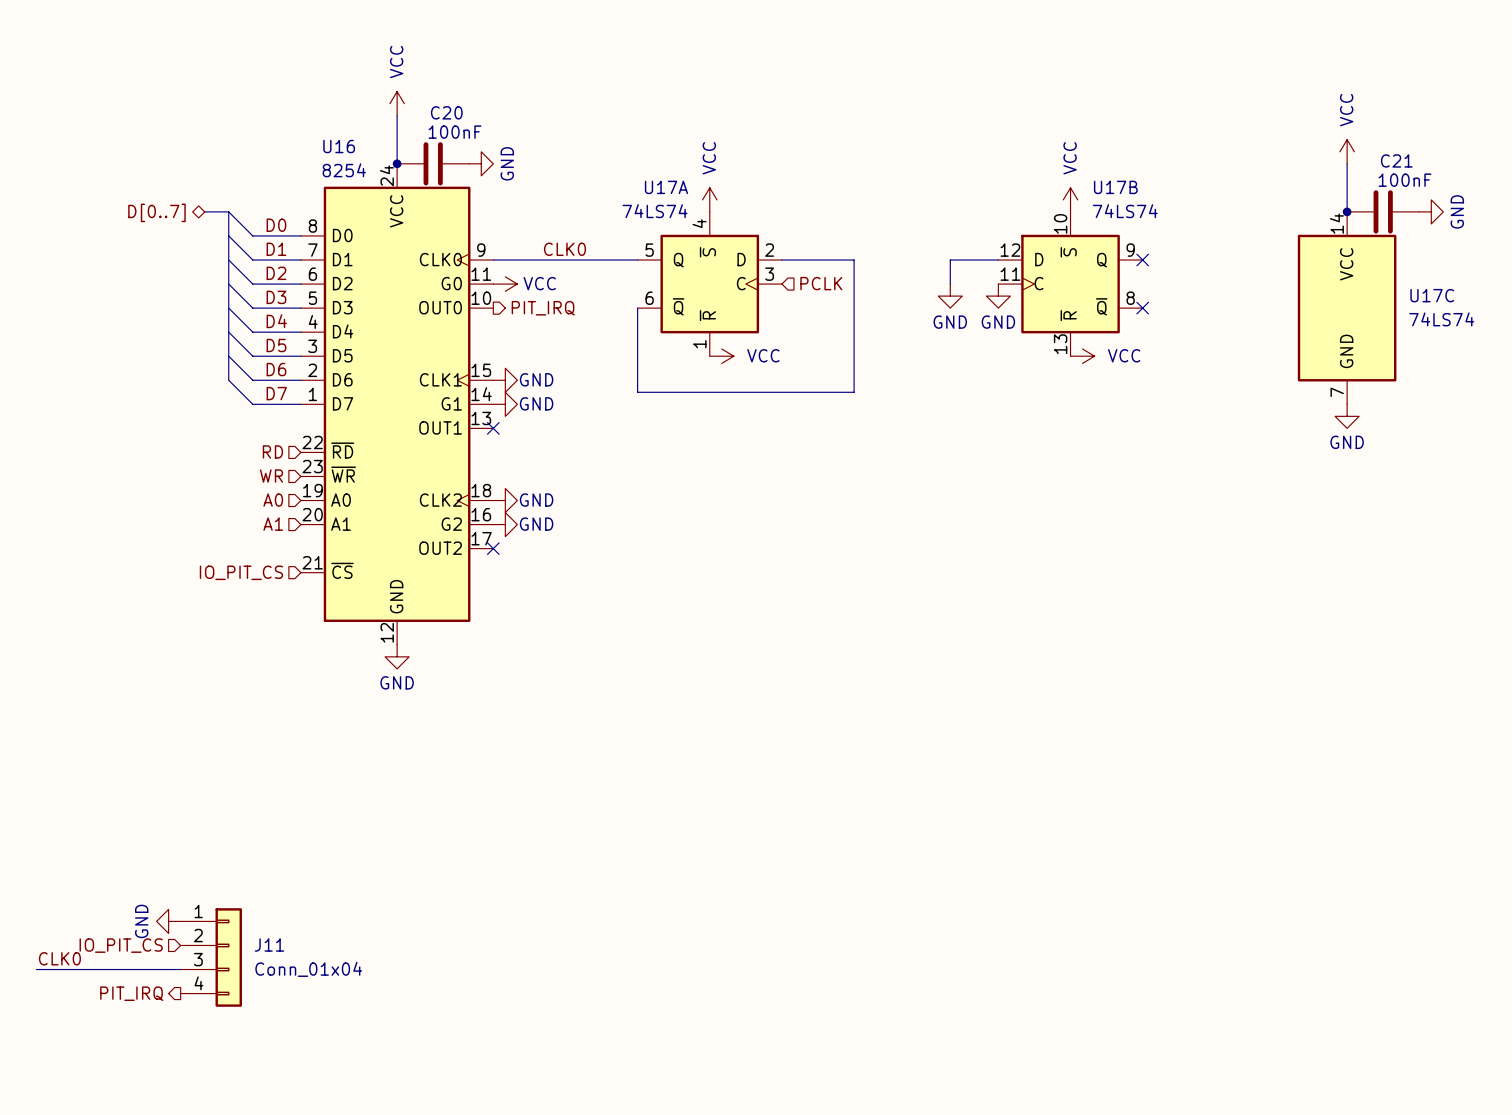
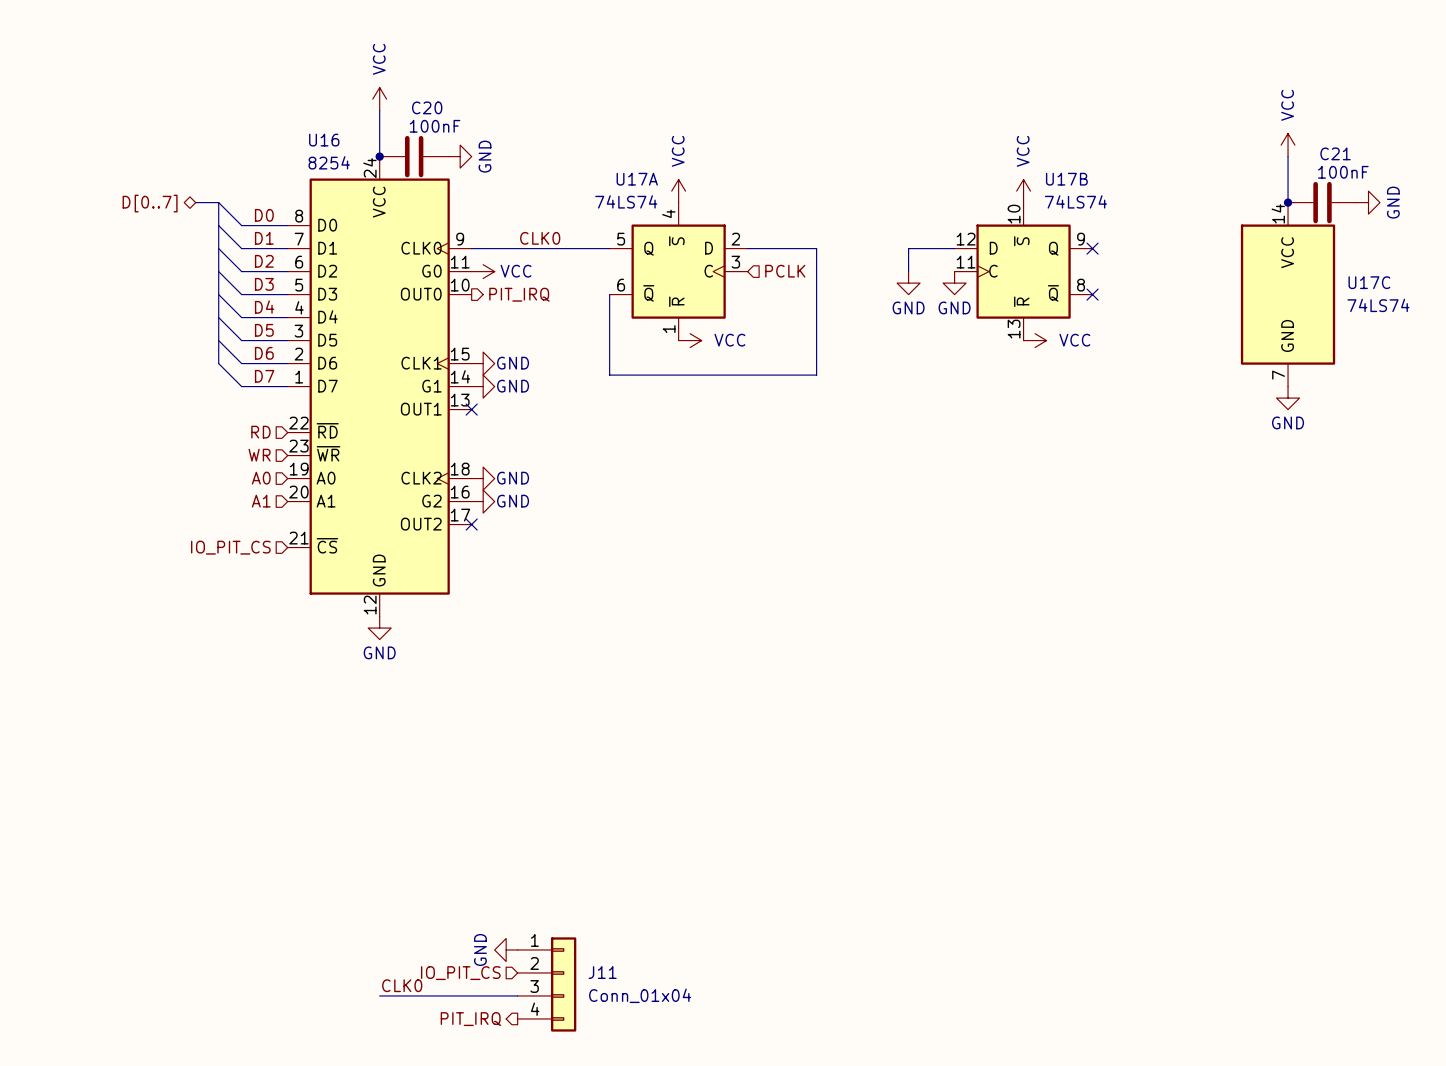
power symbol: GND (168, 921) -> none
hierarchical label: IO_PIT_CS (121, 945) -> none
J11 position: (211, 957) -> (546, 984)
label: CLK0 (59, 958) -> none
wire: (36, 969) (180, 969) -> none
hierarchical label: PIT_IRQ (131, 993) -> none
power symbol: none -> GND (506, 949)
hierarchical label: none -> IO_PIT_CS (460, 973)
label: none -> CLK0 (402, 985)
wire: none -> (379, 995) (517, 995)
hierarchical label: none -> PIT_IRQ (470, 1019)

